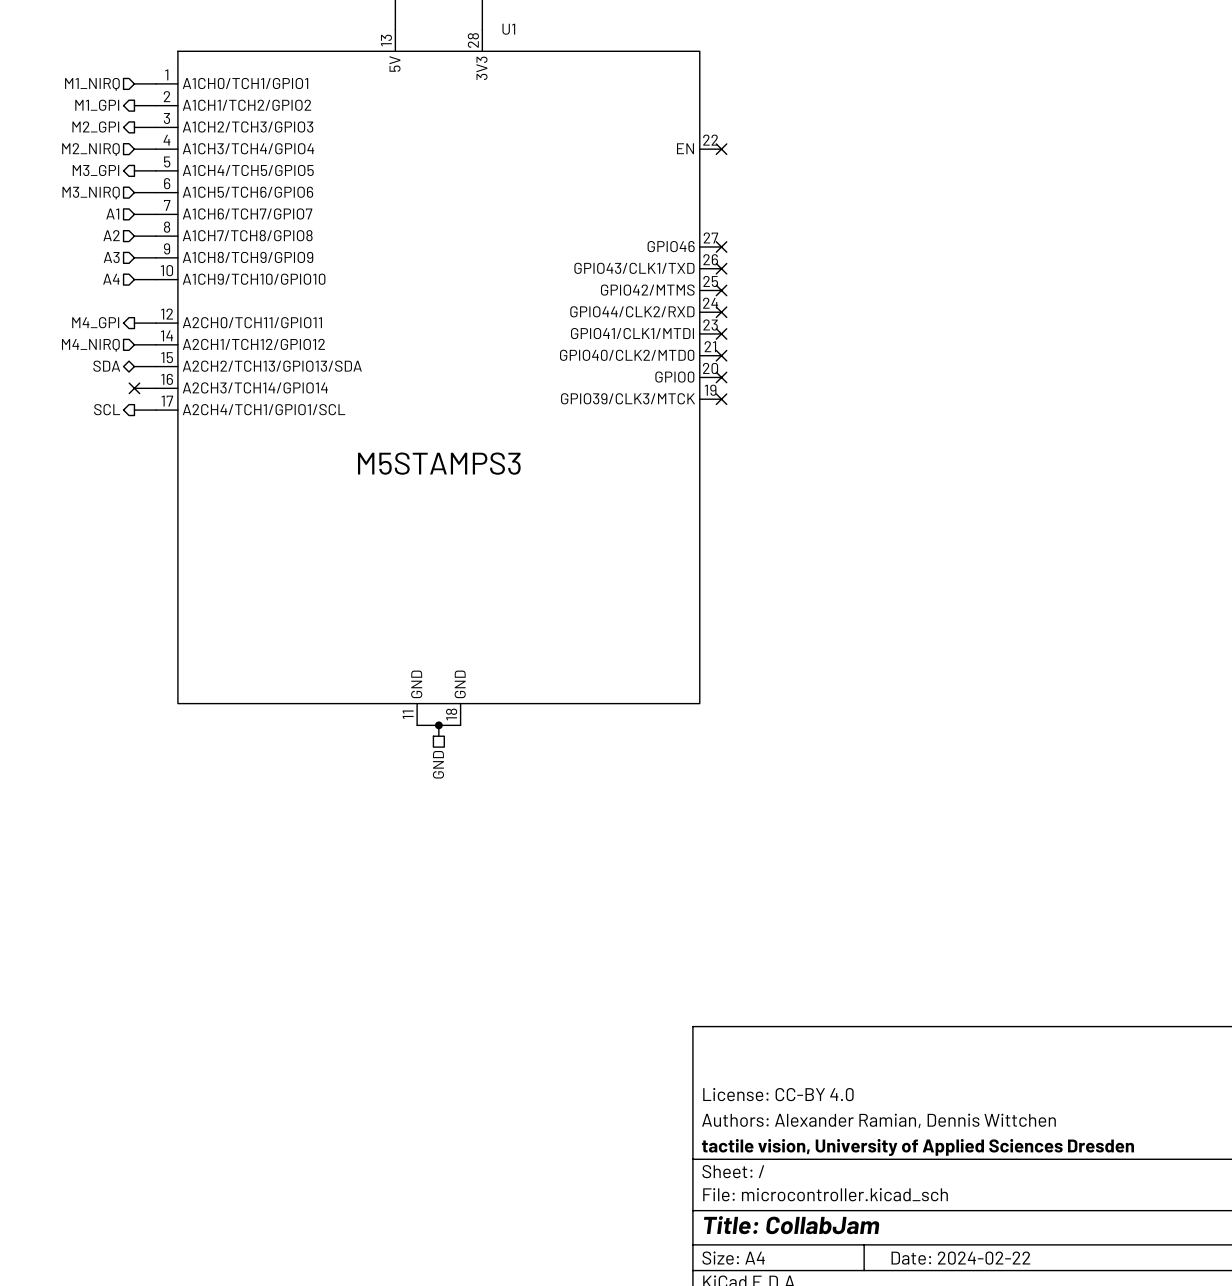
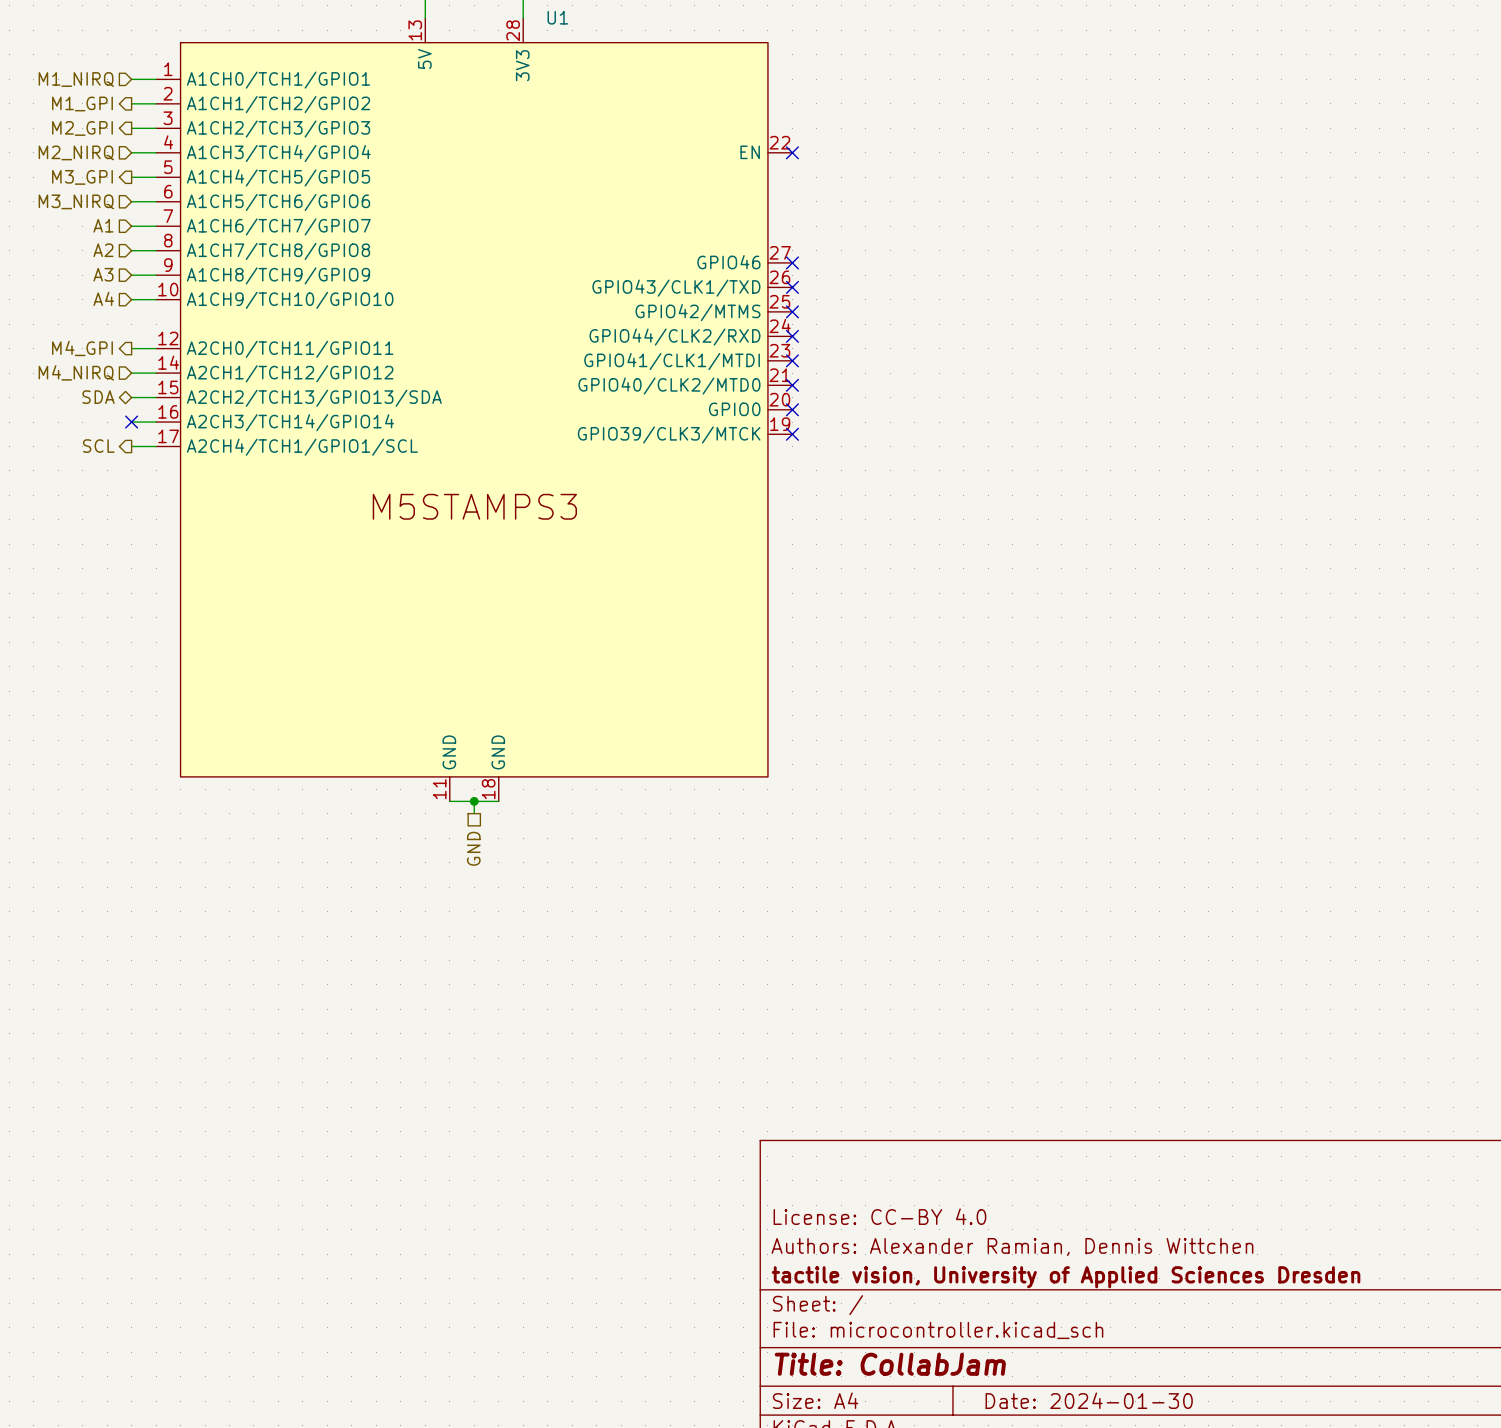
title block: Date: 2024-02-22 (960, 1258) -> Date: 2024-01-30 (1089, 1400)

